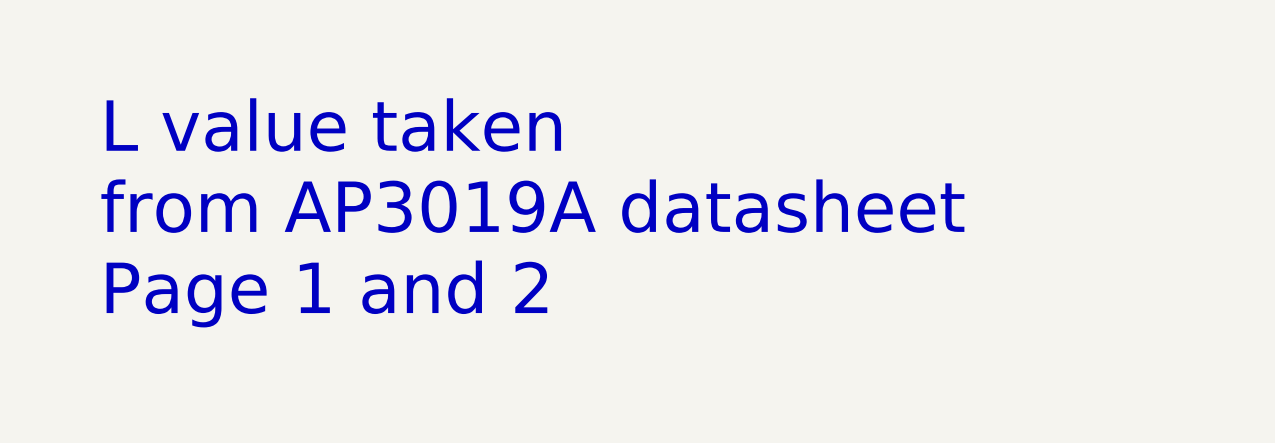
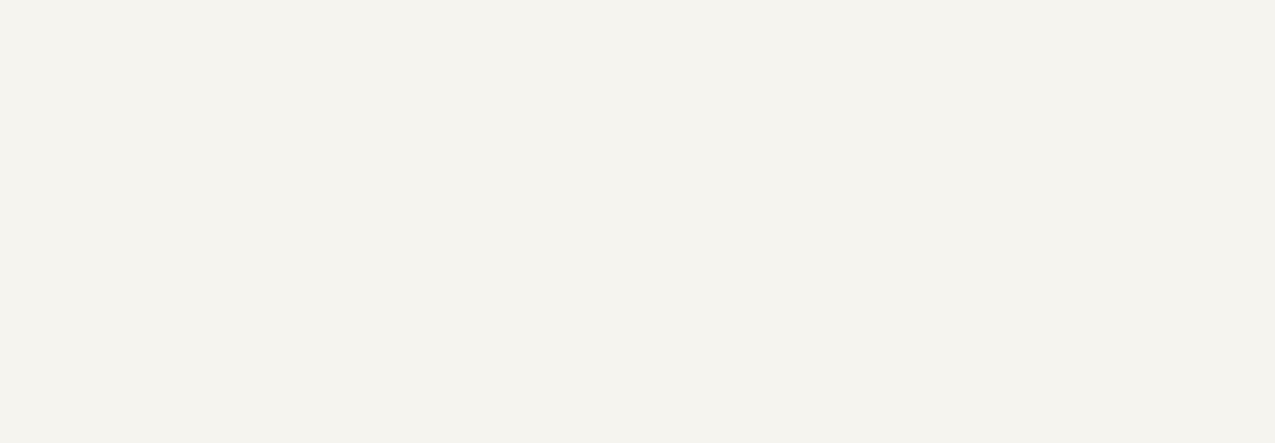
text: L value taken (333, 125) -> none
text: from AP3019A datasheet (532, 206) -> none
text: Page 1 and 2 (326, 293) -> none

